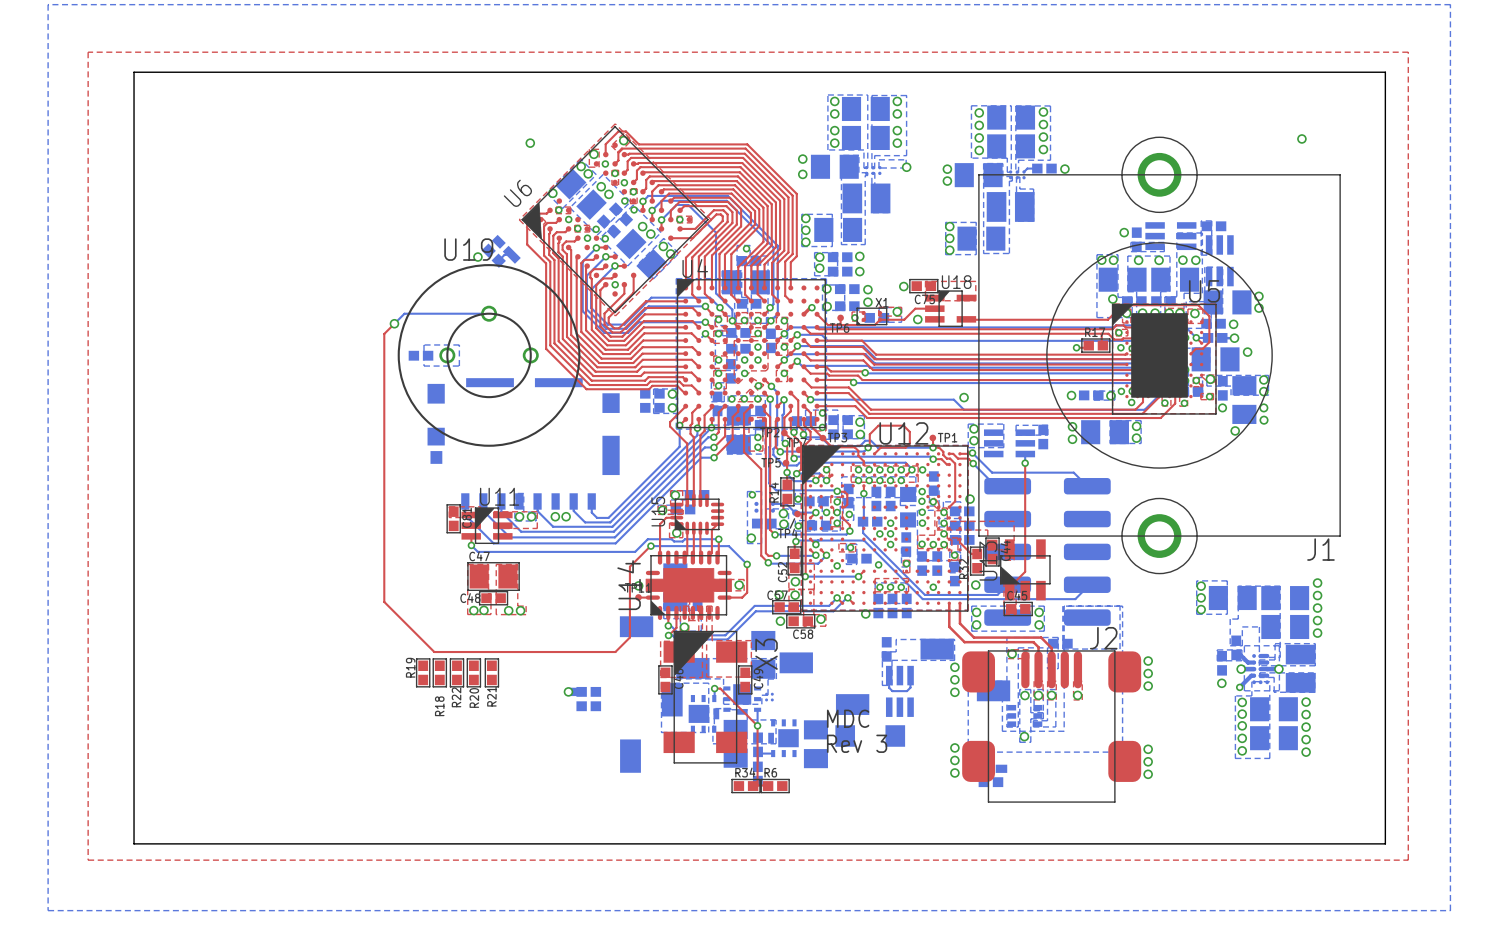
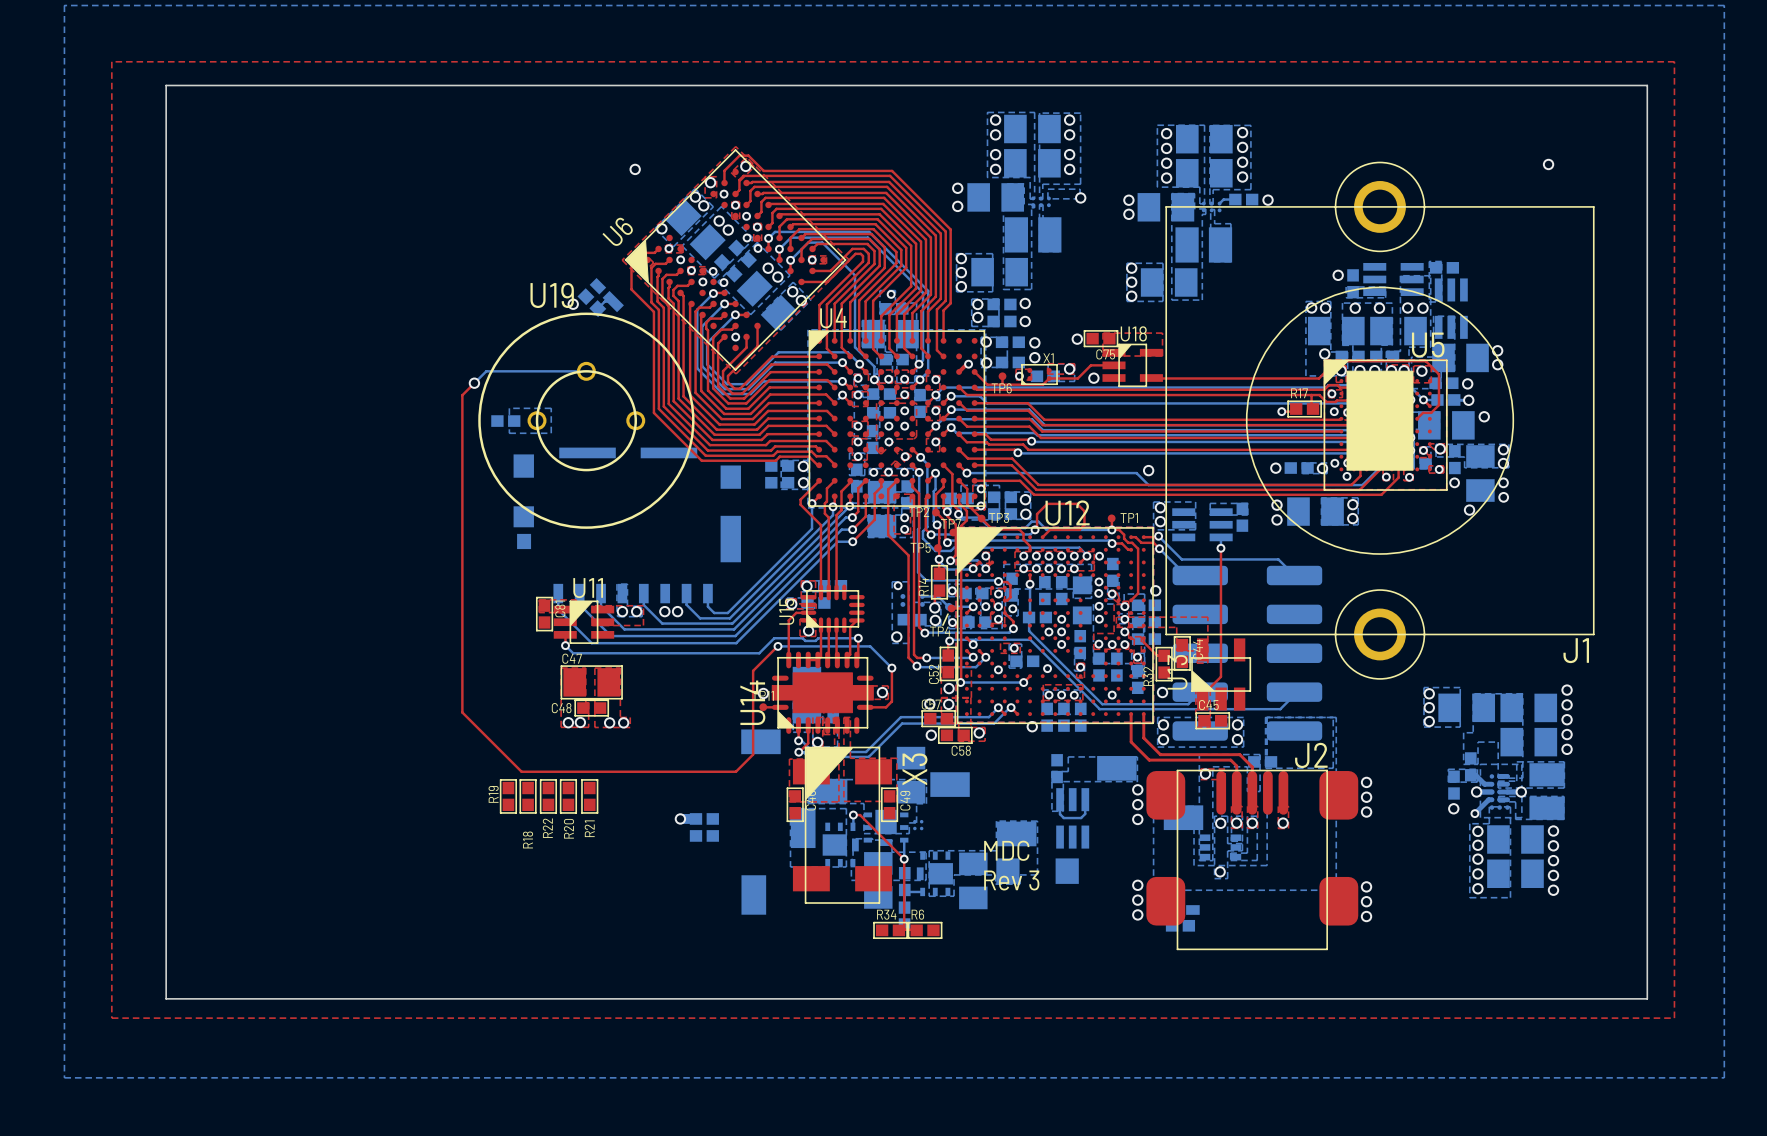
bottom zone outline: none -> (996, 821) (1037, 821) (1037, 874) (1020, 874) (1020, 884) (995, 884) (995, 874) (954, 874) (954, 896) (929, 896) (929, 850) (996, 850) (996, 821)

